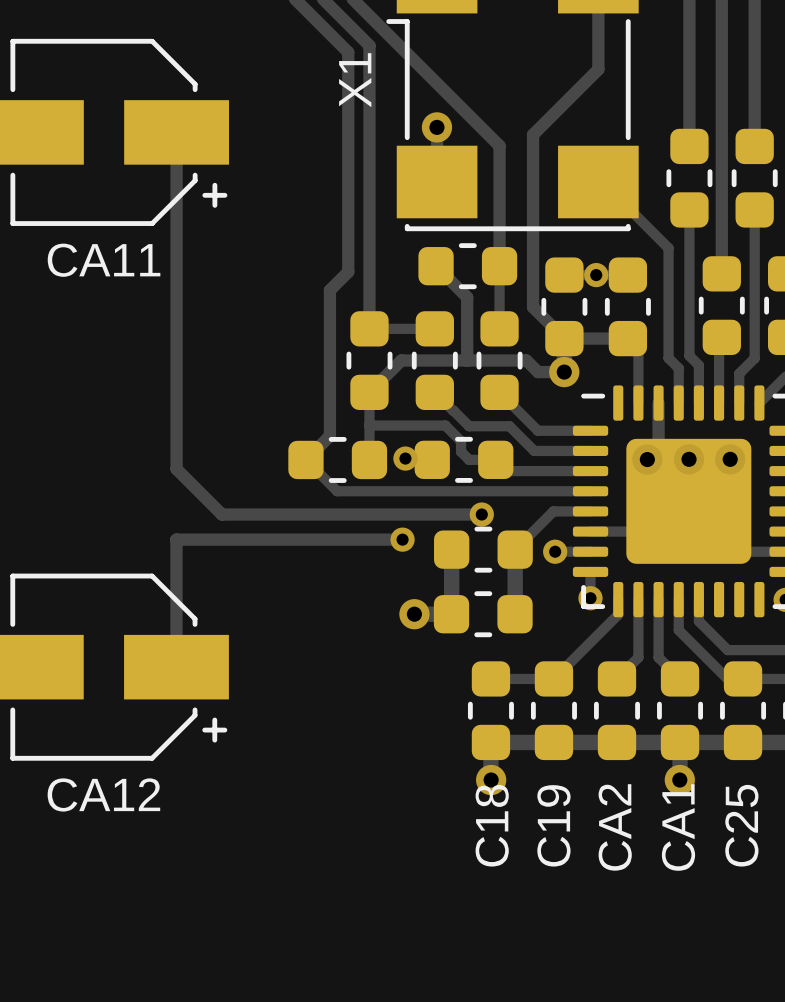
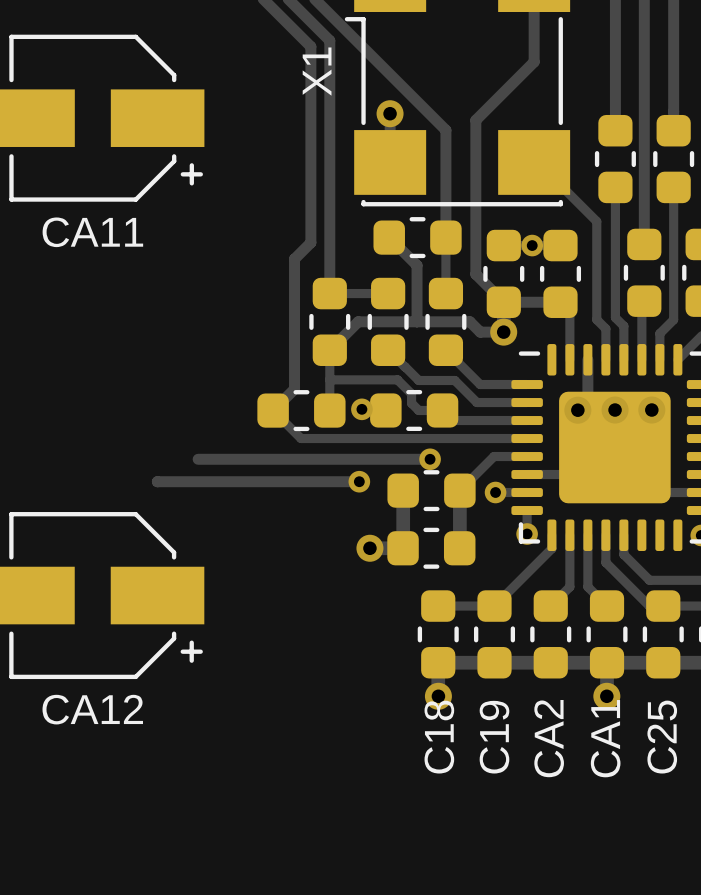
track: (176, 132) (176, 469) (221, 514) -> none
track: (176, 539) (176, 667) -> none

